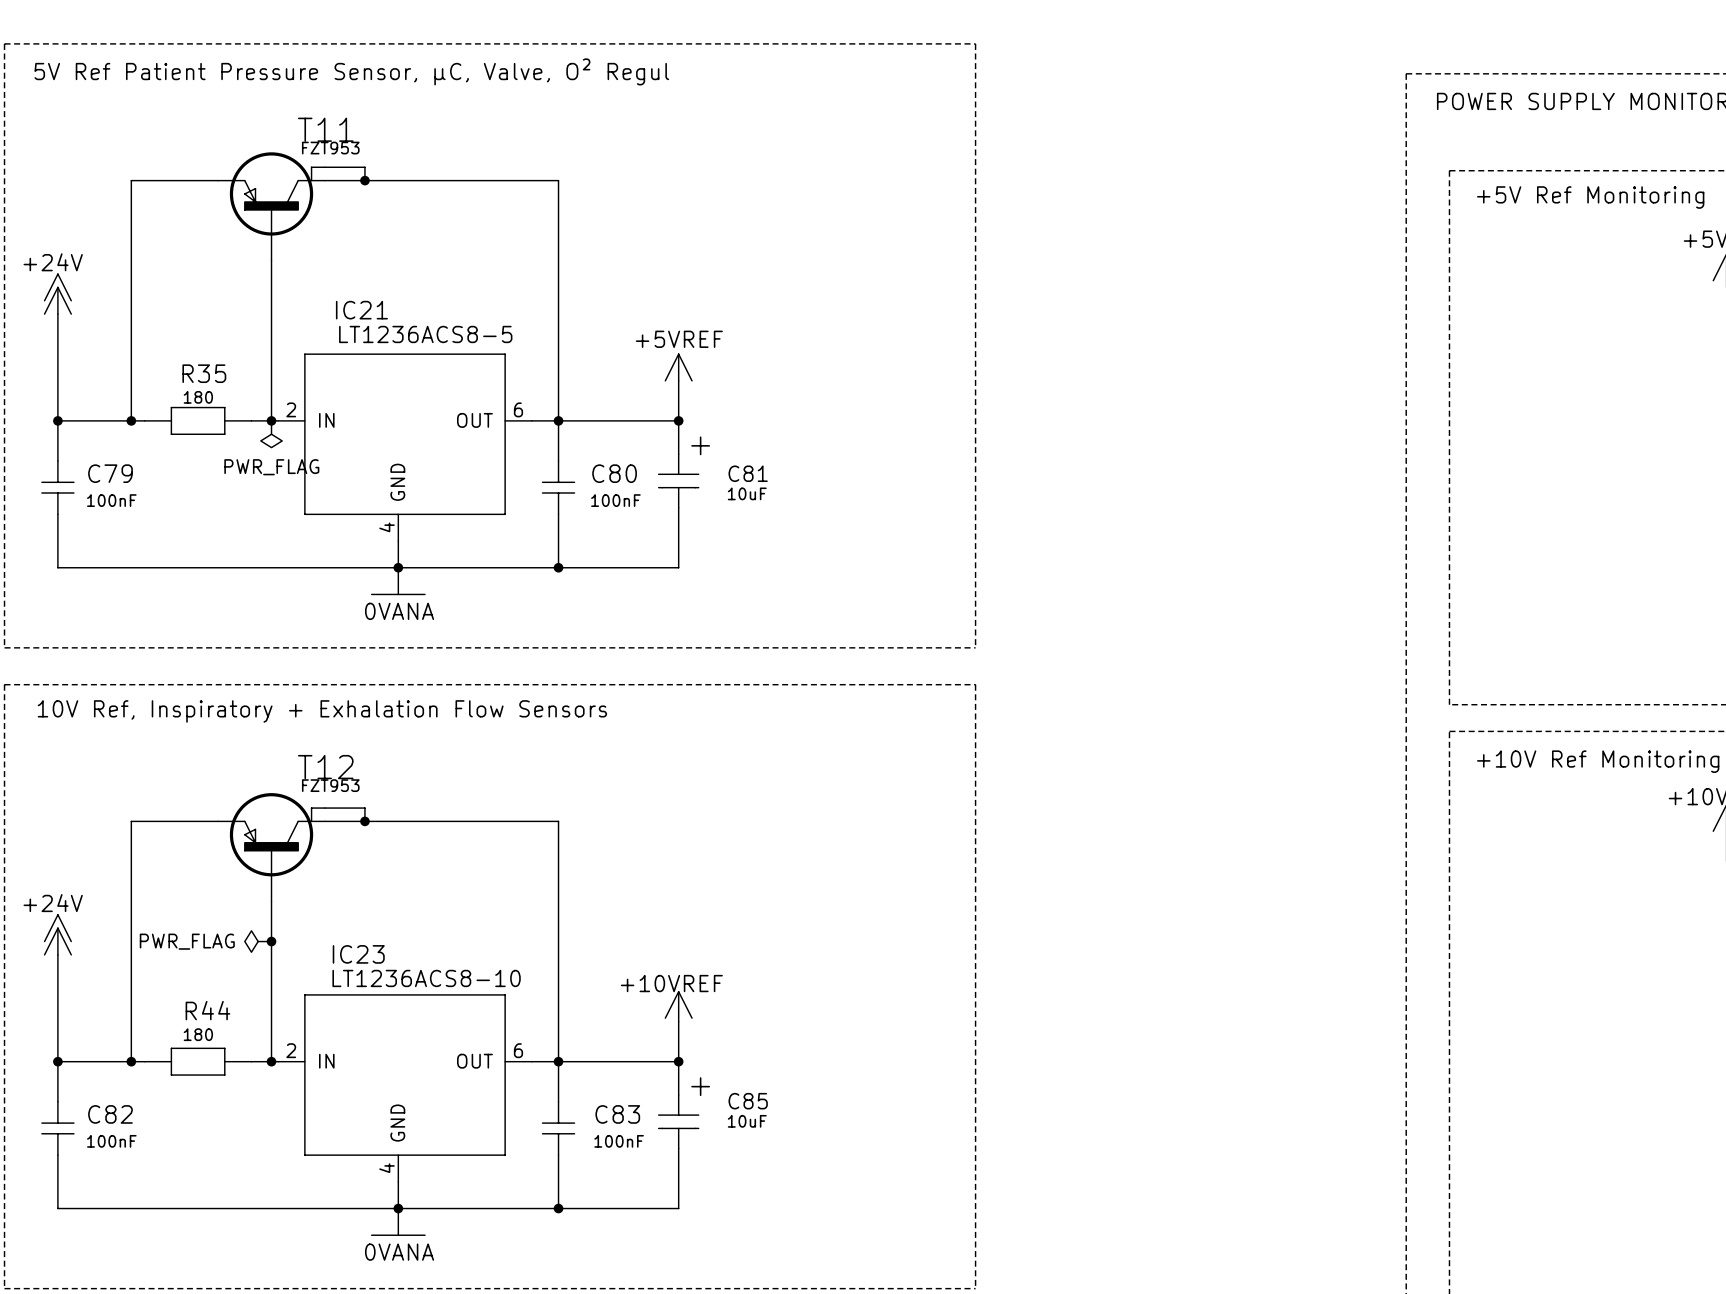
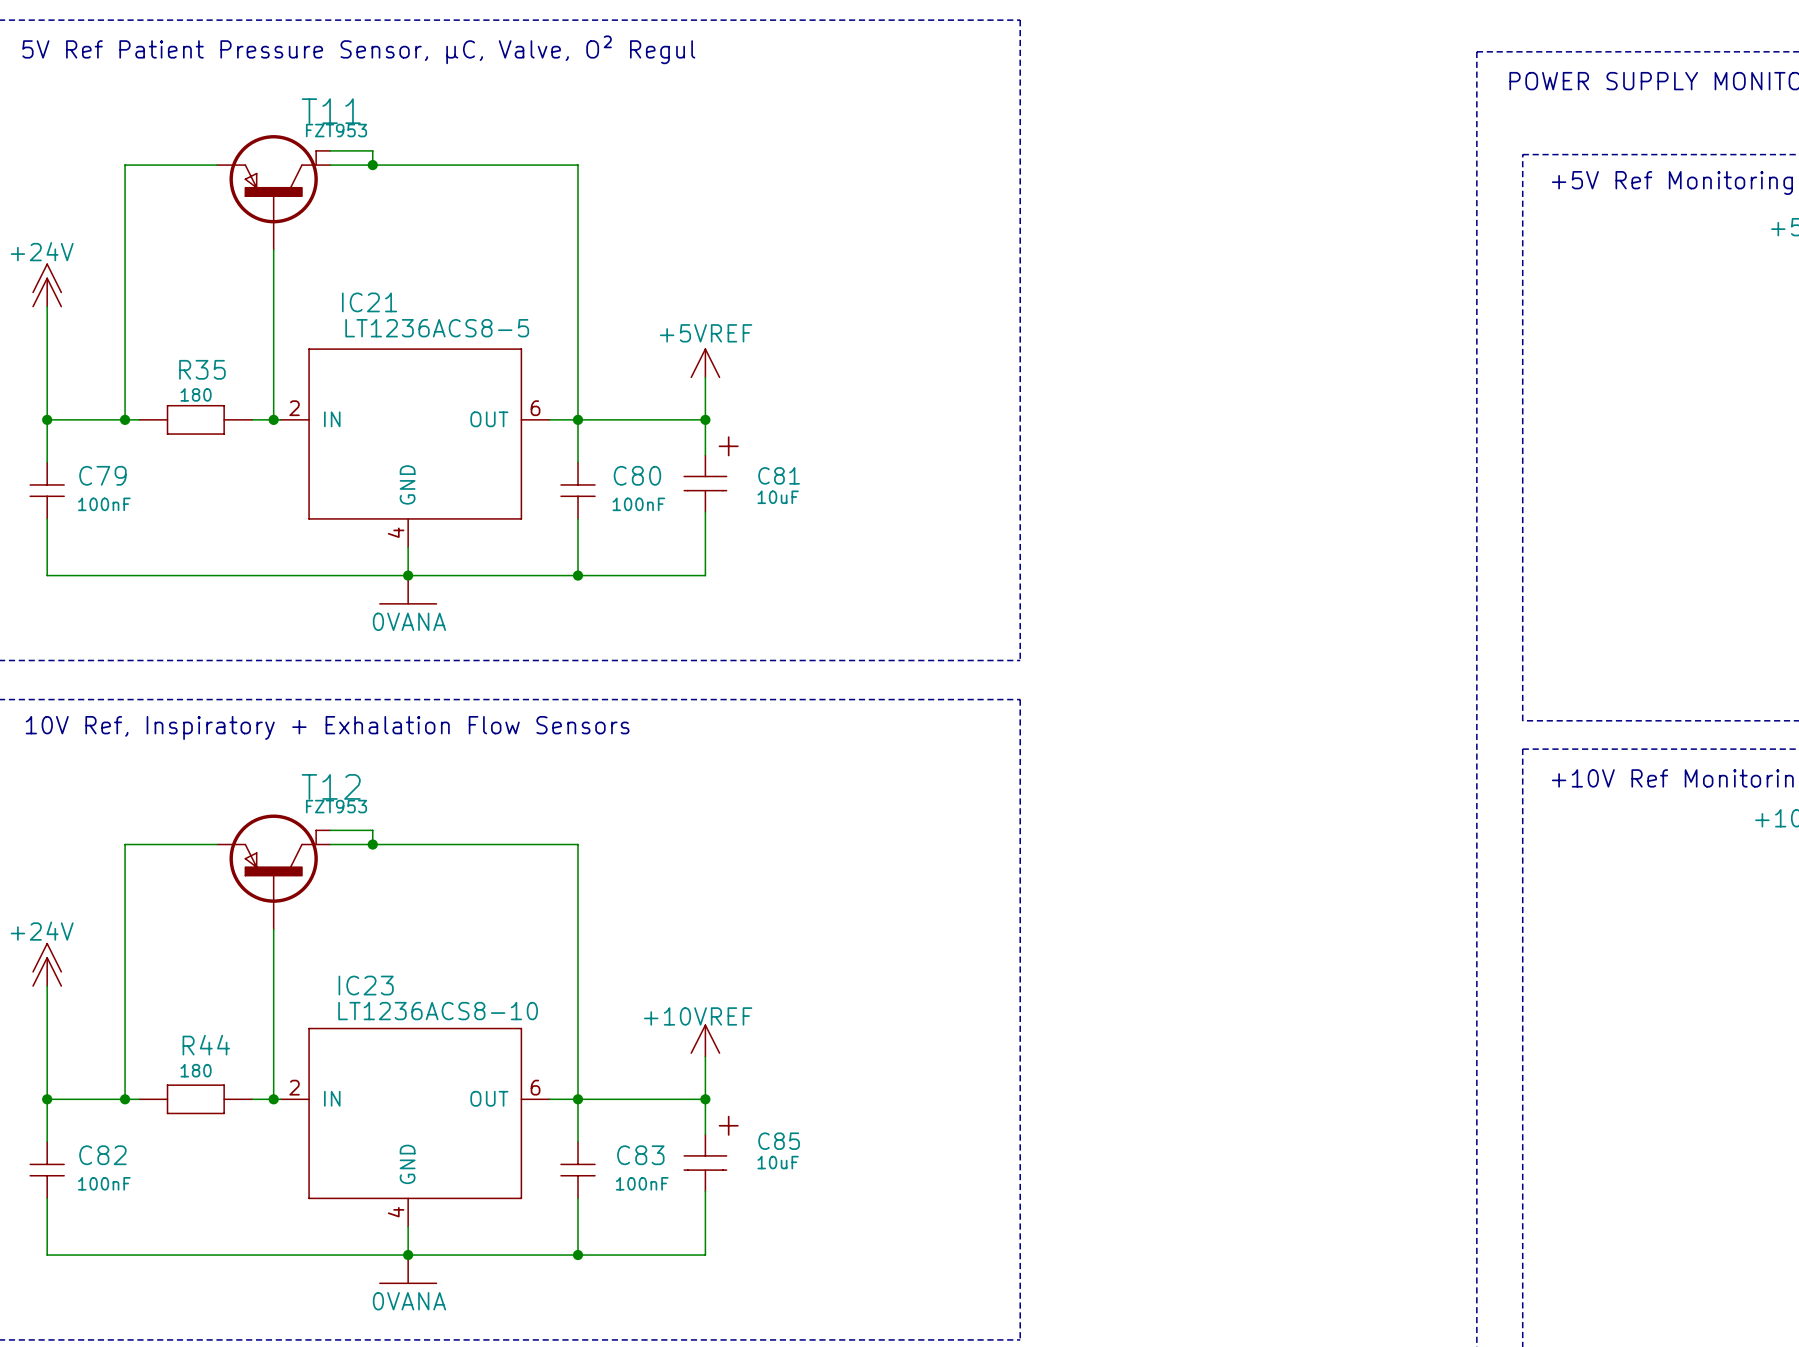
power symbol: PWR_FLAG (271, 434) -> none
power symbol: PWR_FLAG (258, 941) -> none
junction: (271, 941) -> none

